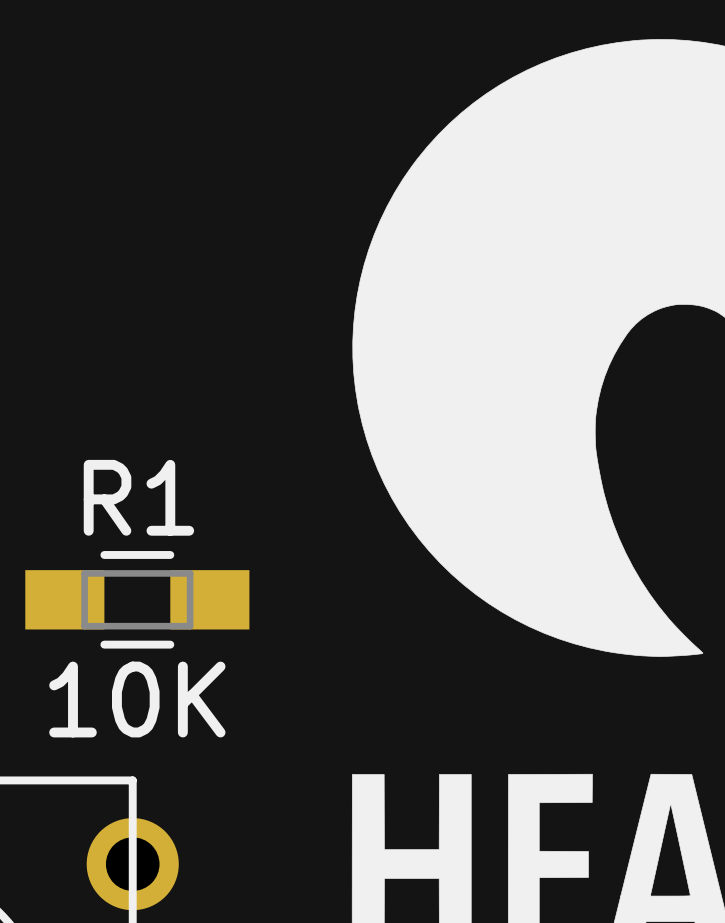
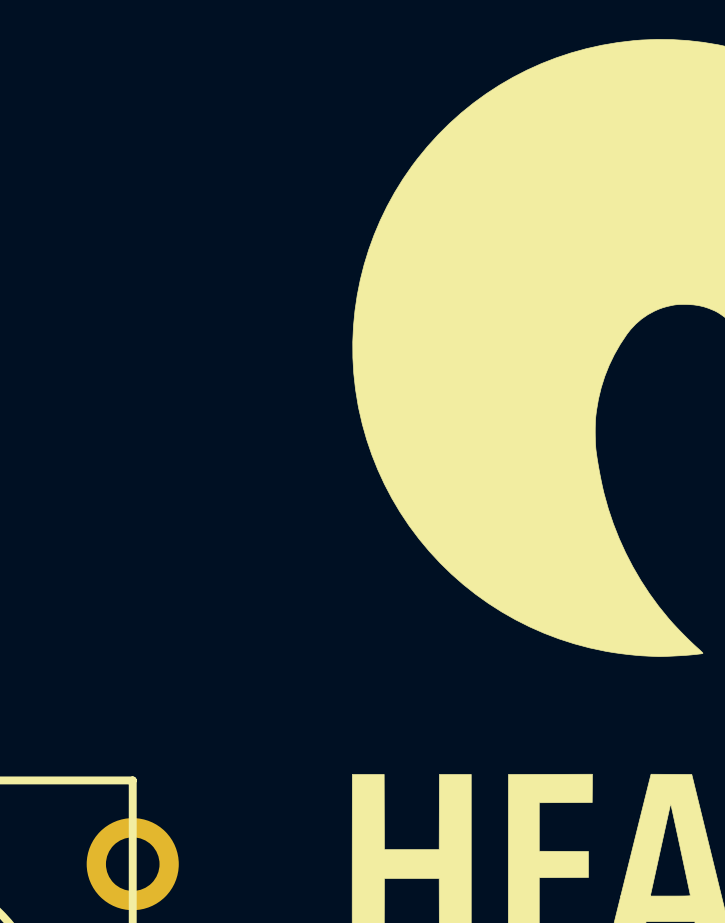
R1: 10K (137, 599) -> none

